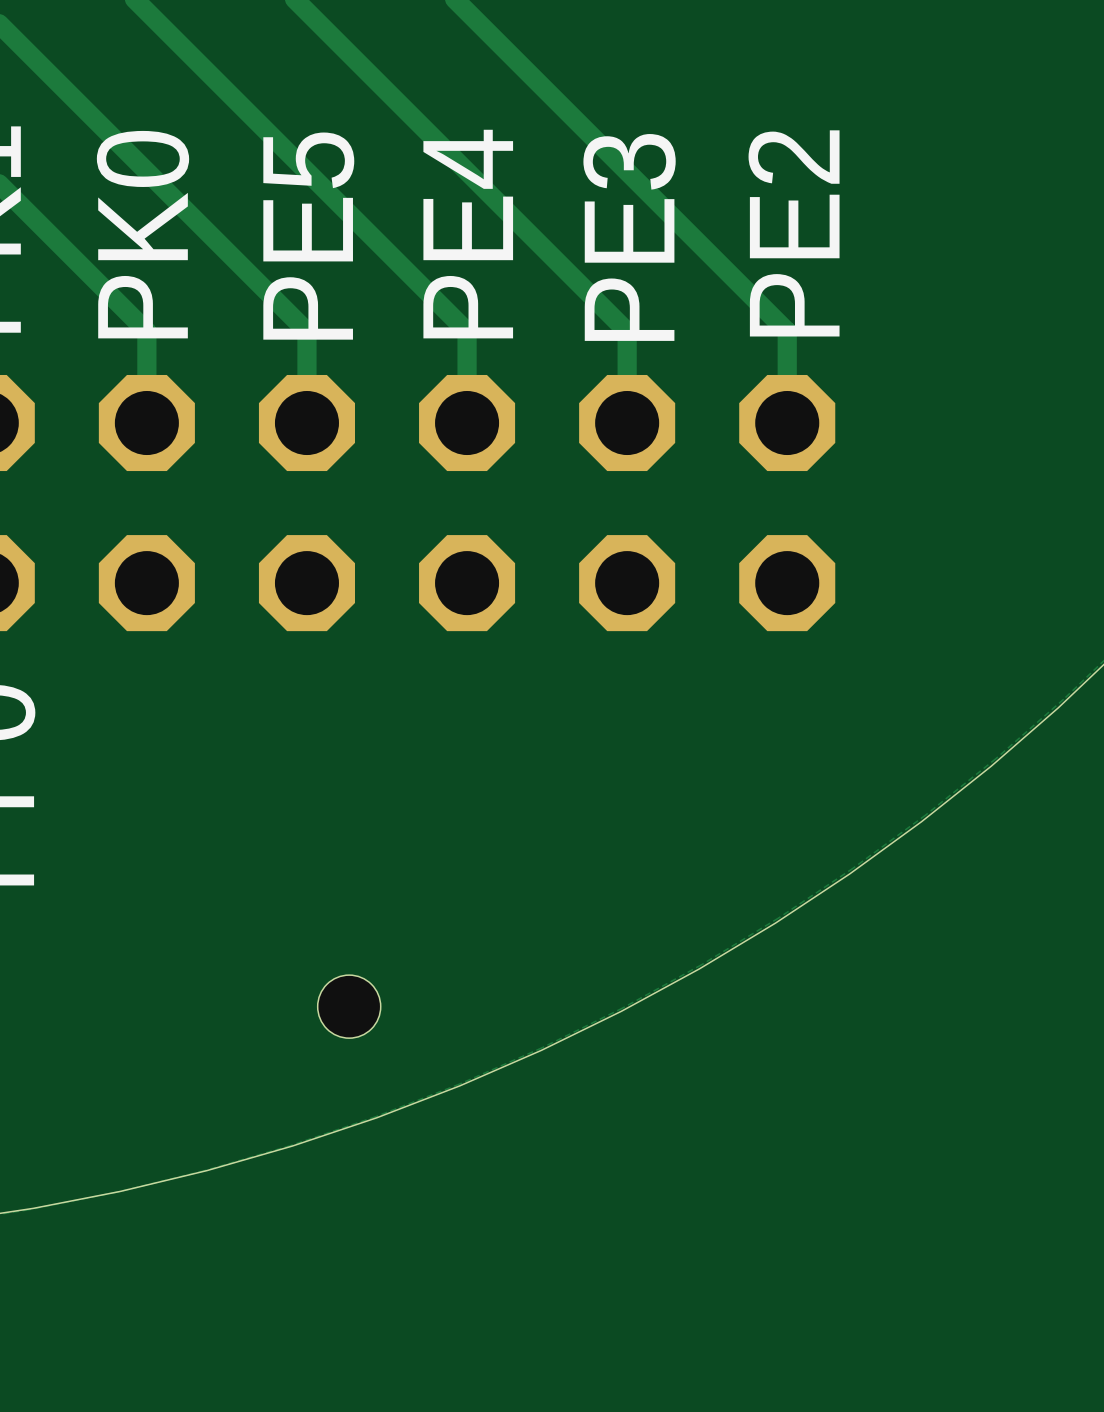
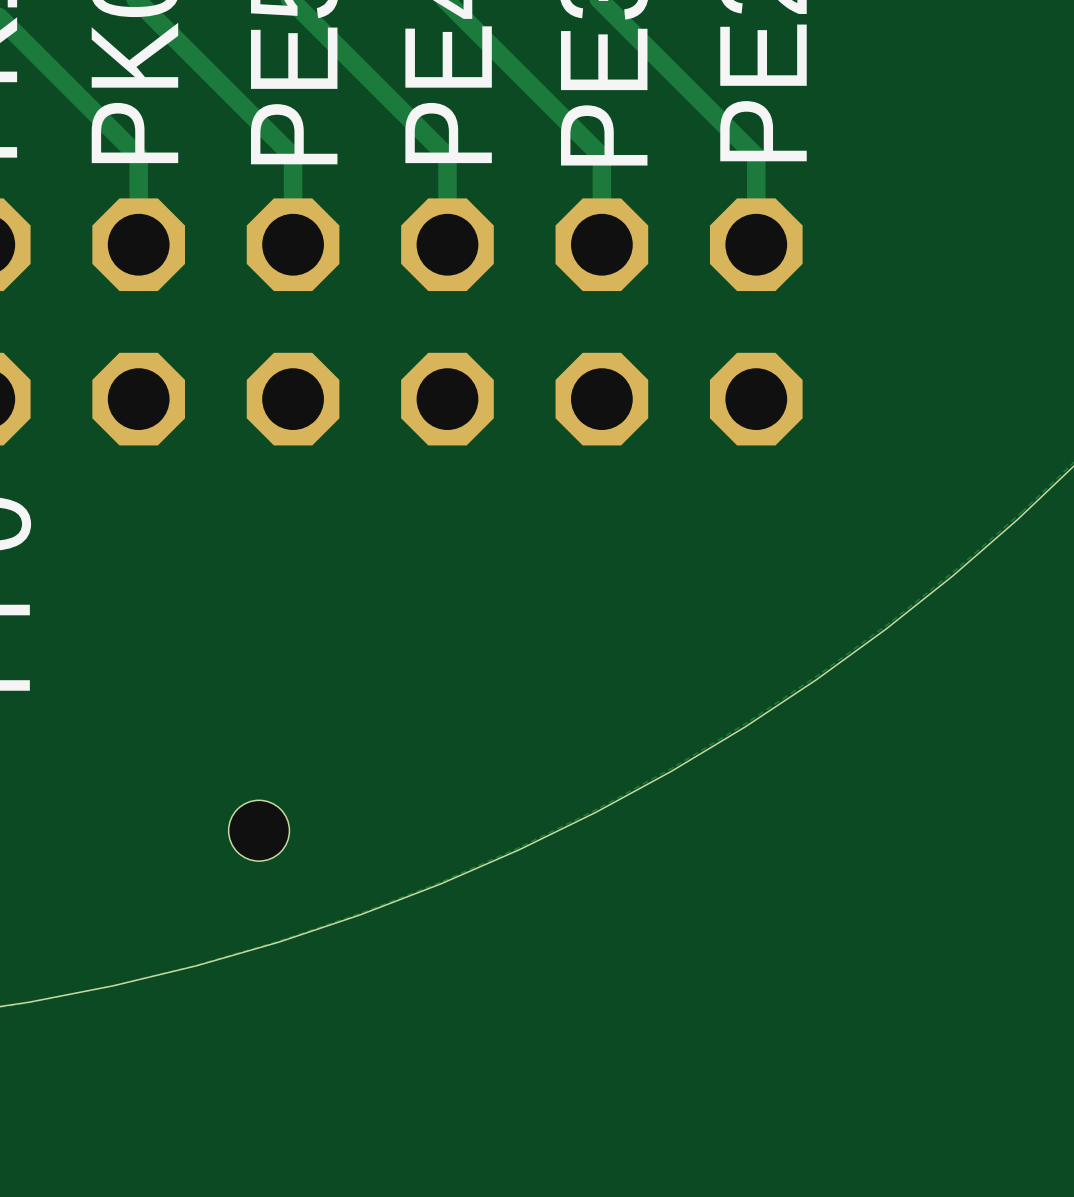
hole position: (349, 1006) -> (259, 830)

